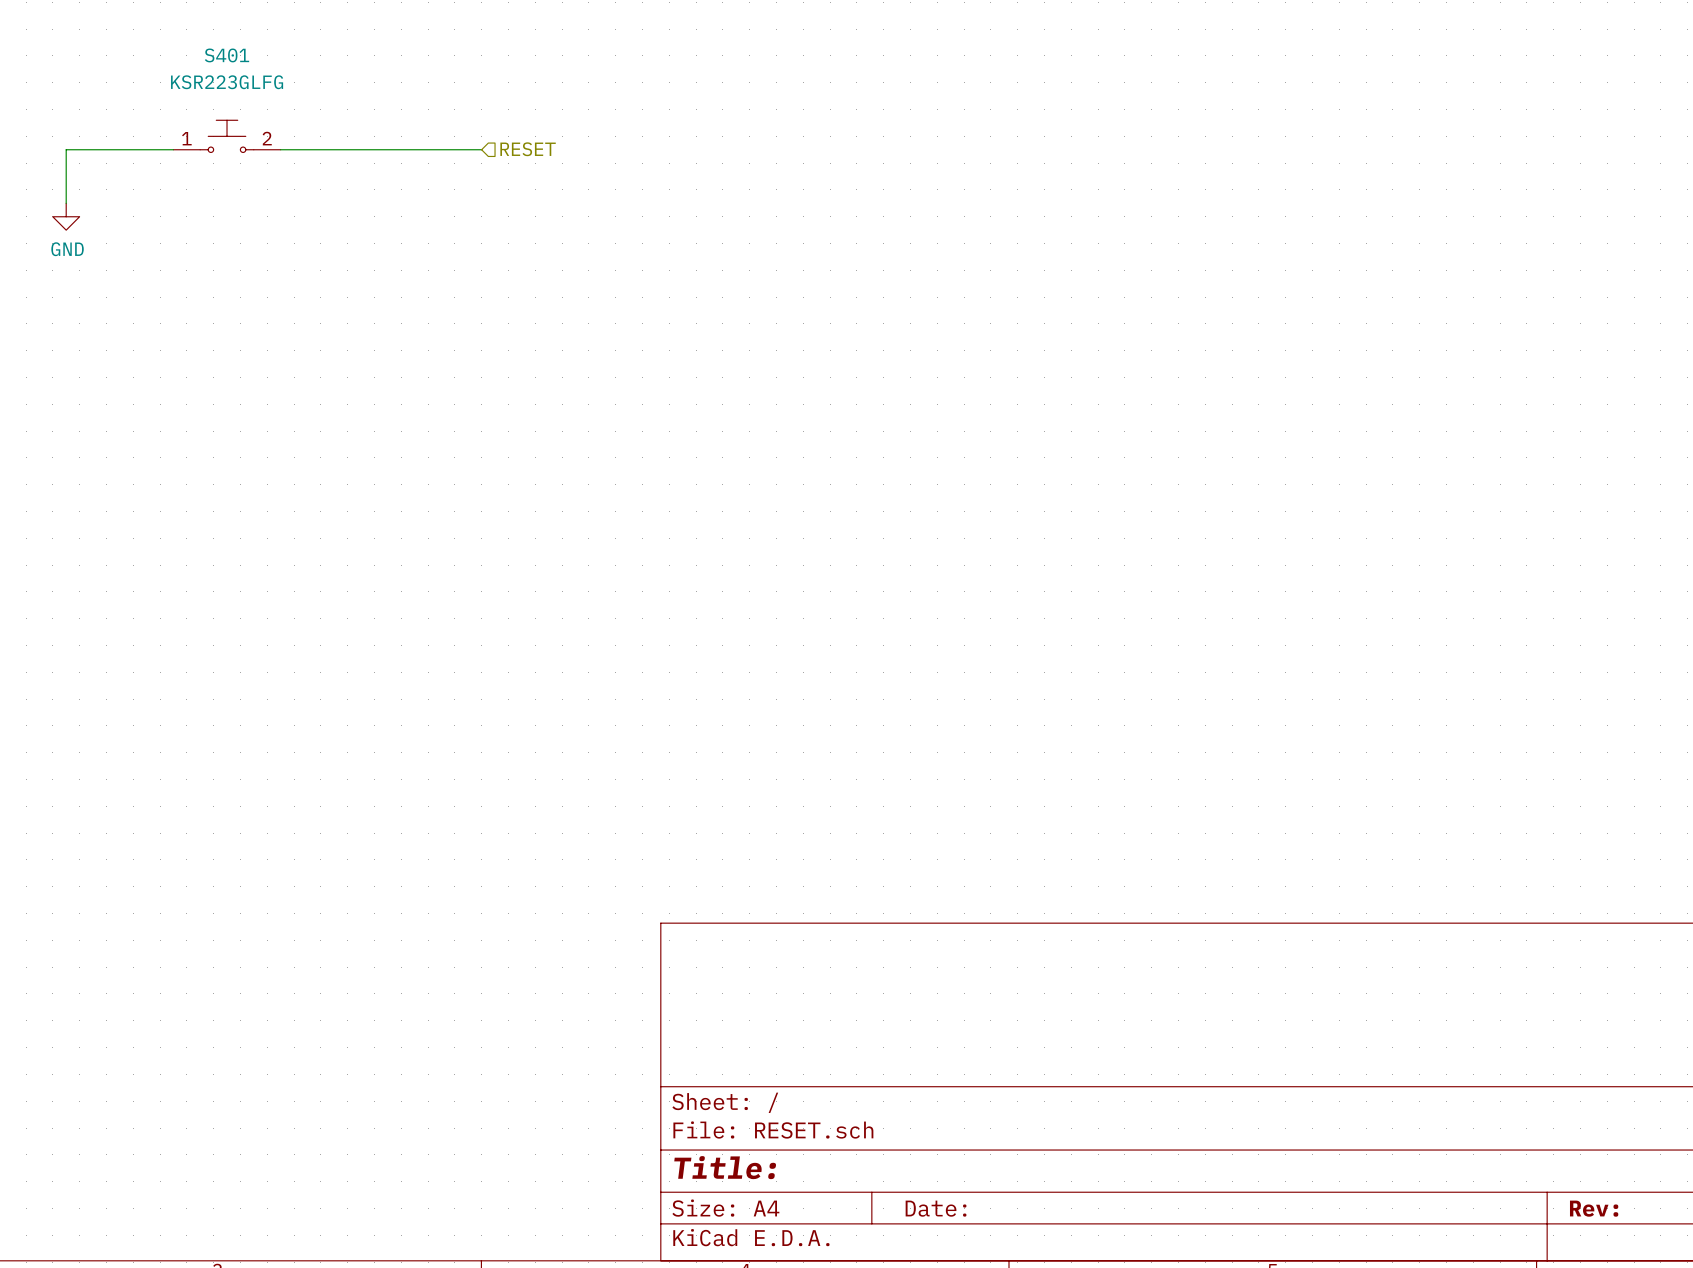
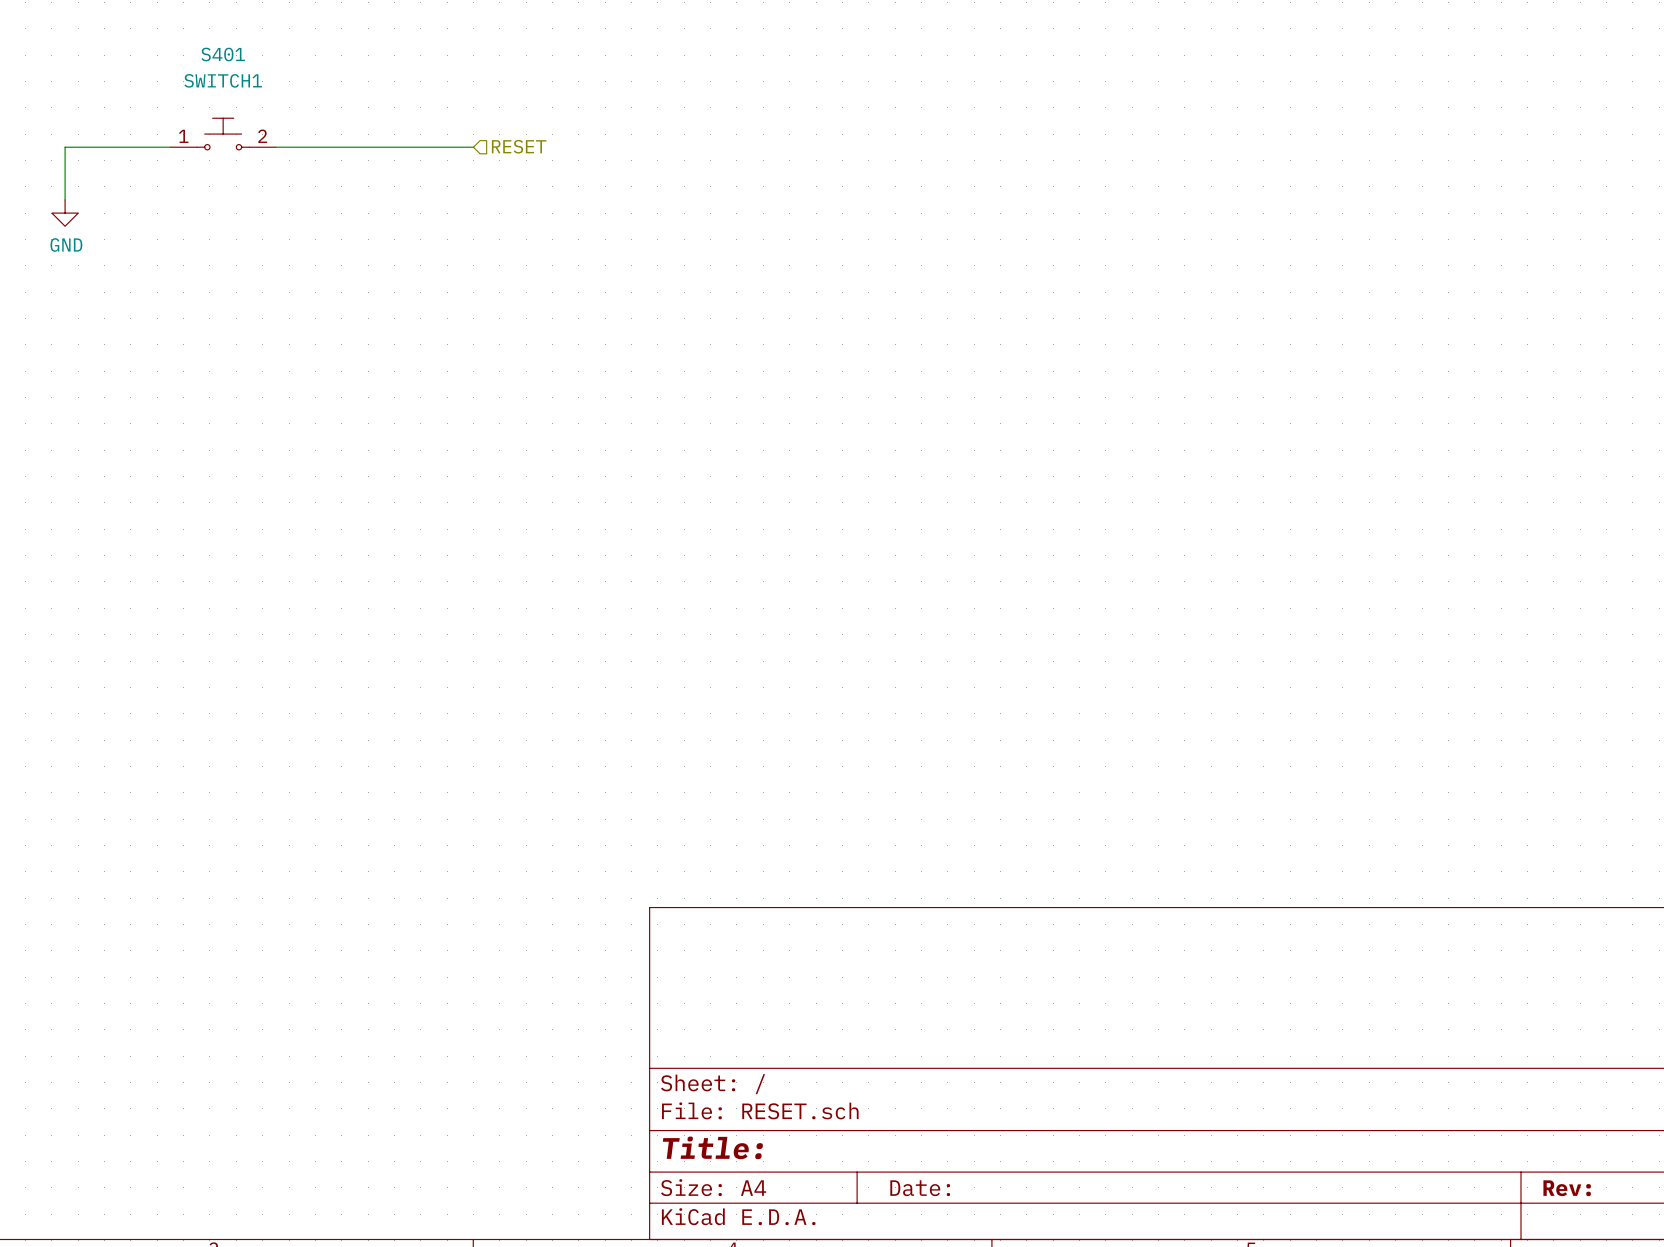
S401 value: KSR223GLFG (227, 82) -> SWITCH1 (223, 80)

